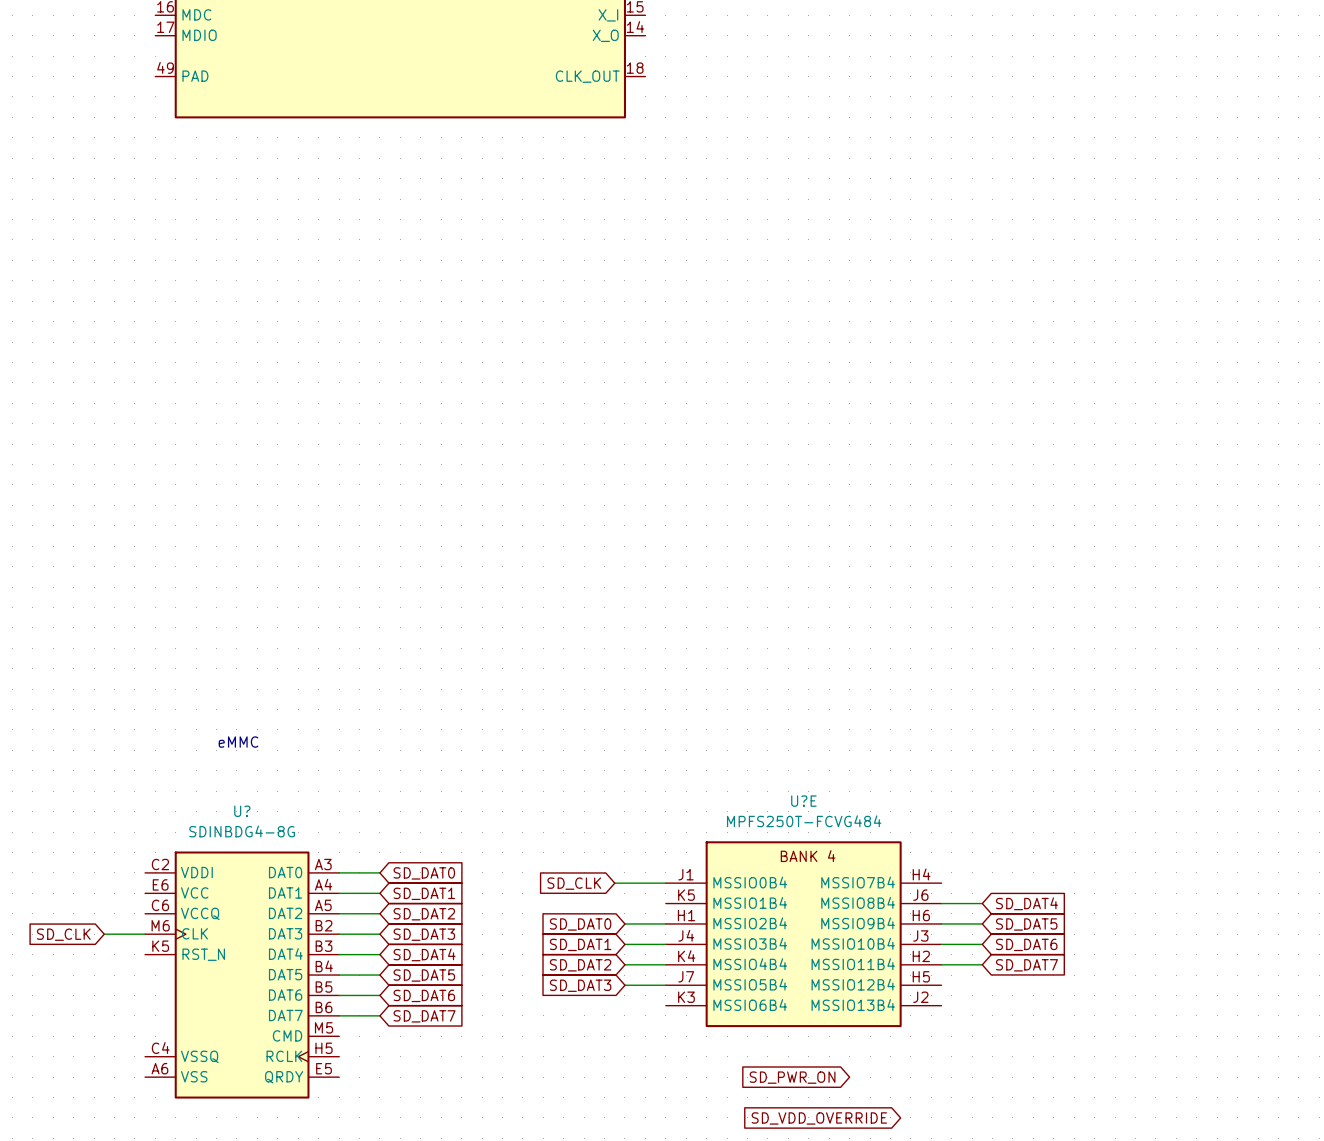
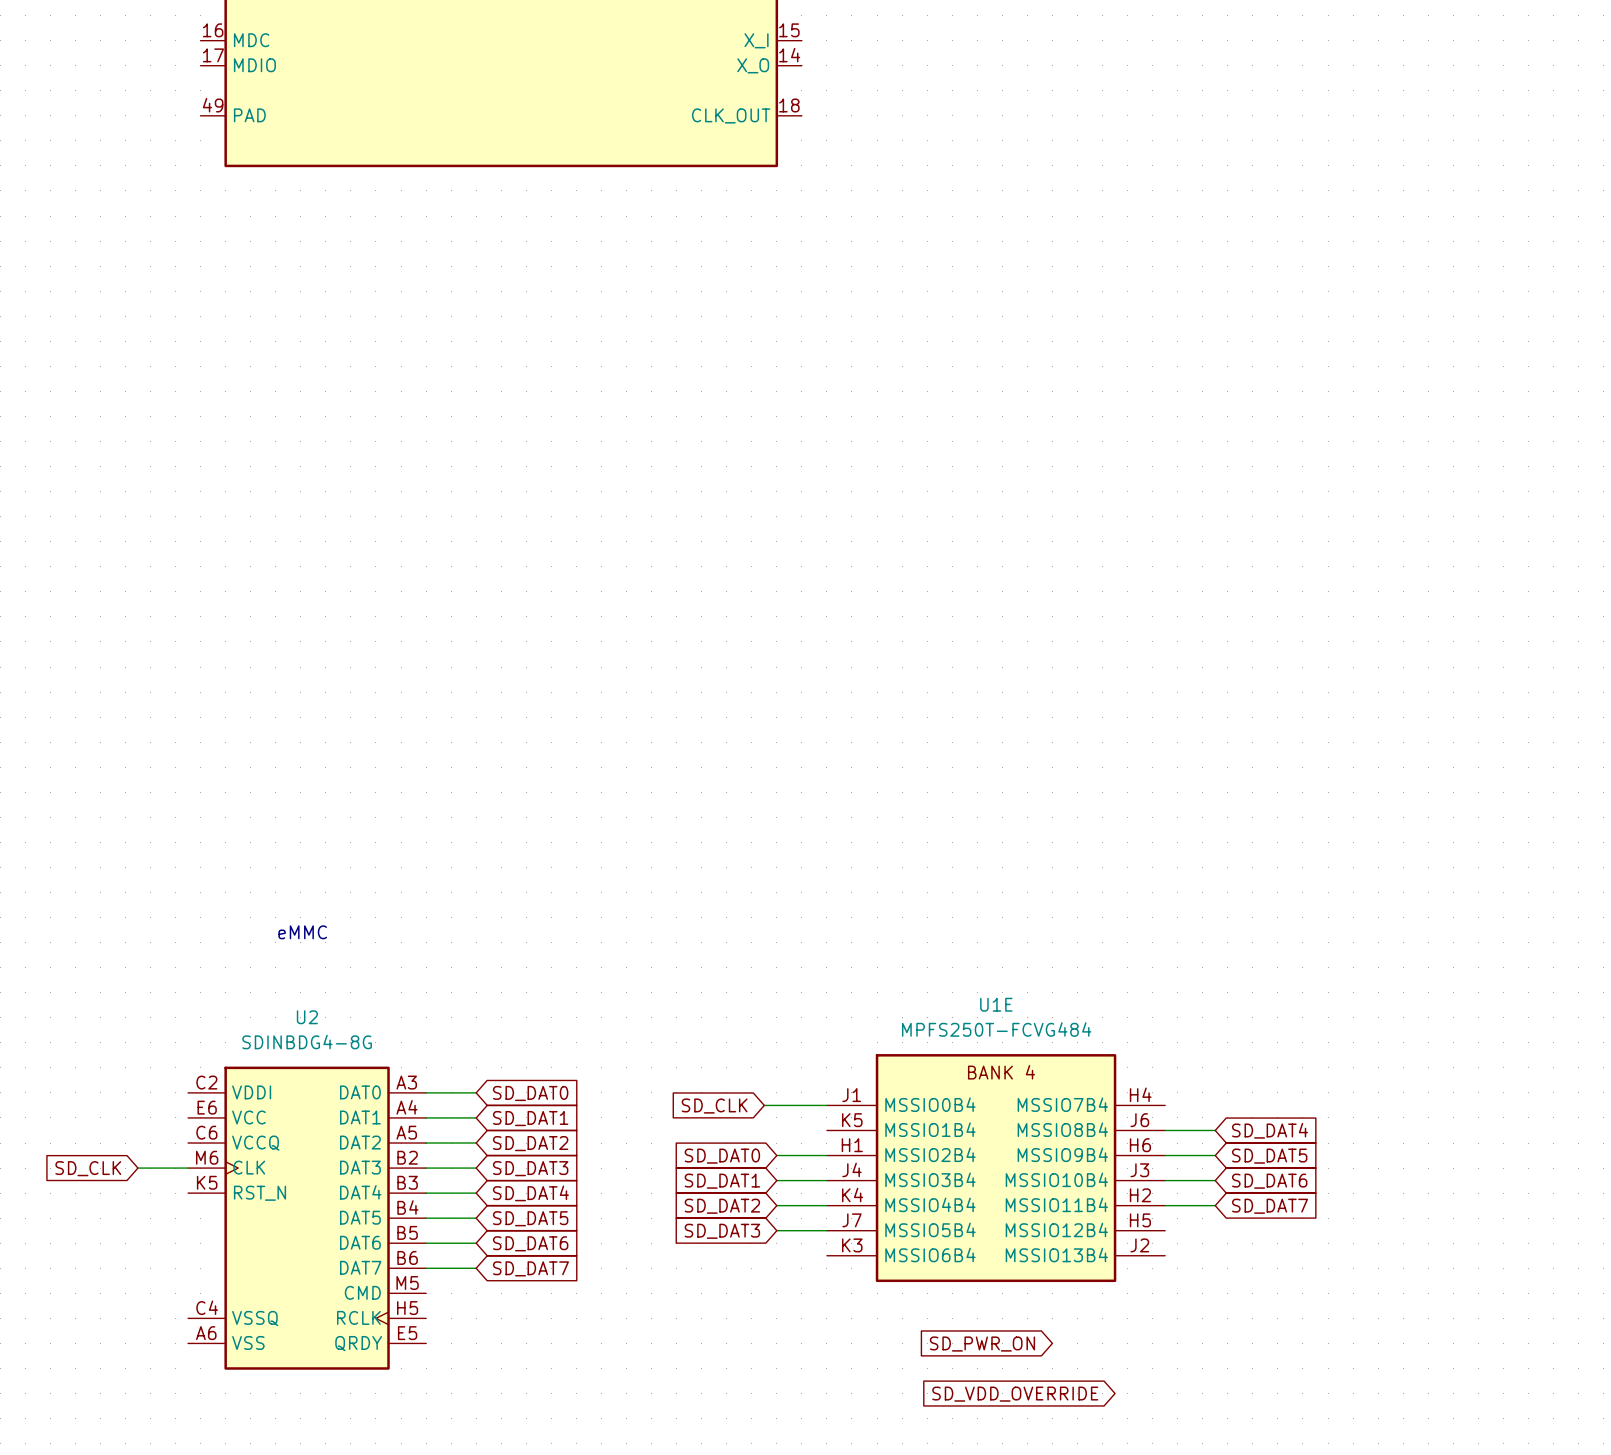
U?E name: U?E (803, 801) -> U1E (996, 1004)
U? name: U? (242, 811) -> U2 (307, 1017)

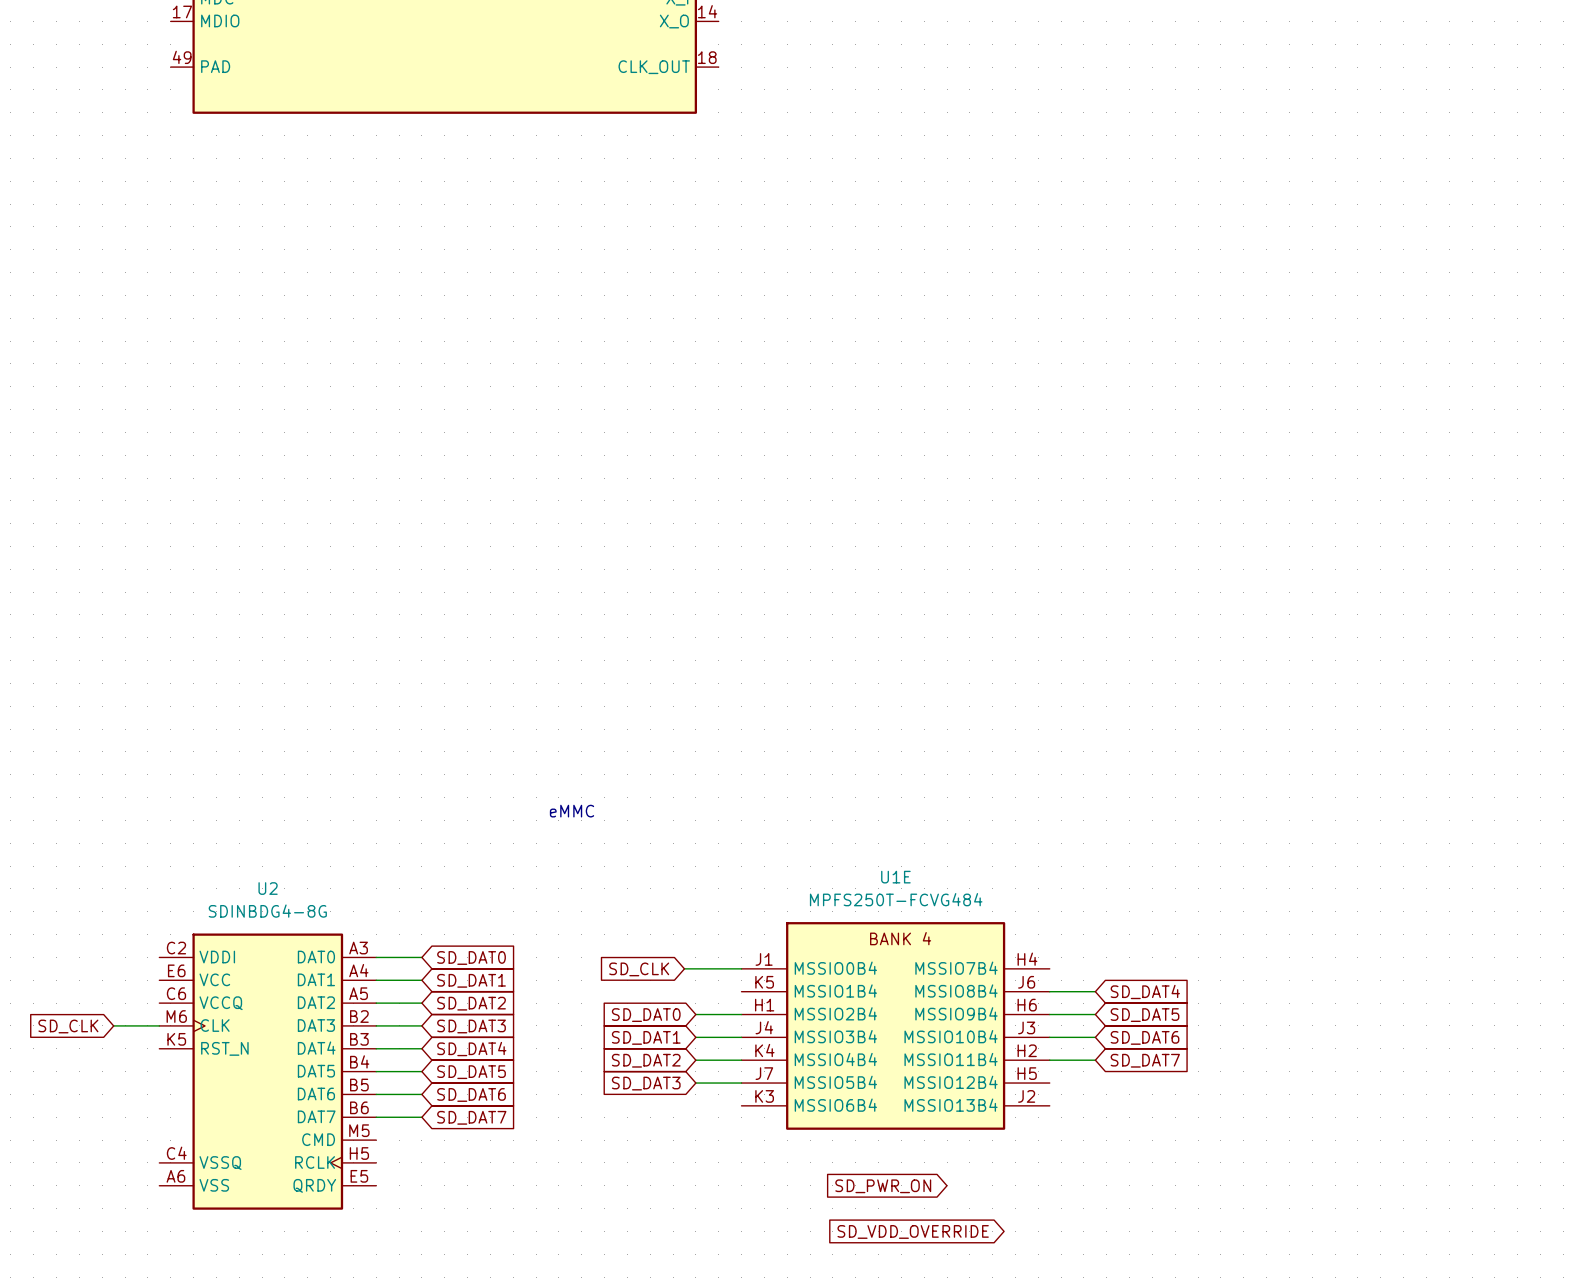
text: eMMC (302, 932) -> none
text: none -> eMMC (572, 811)

